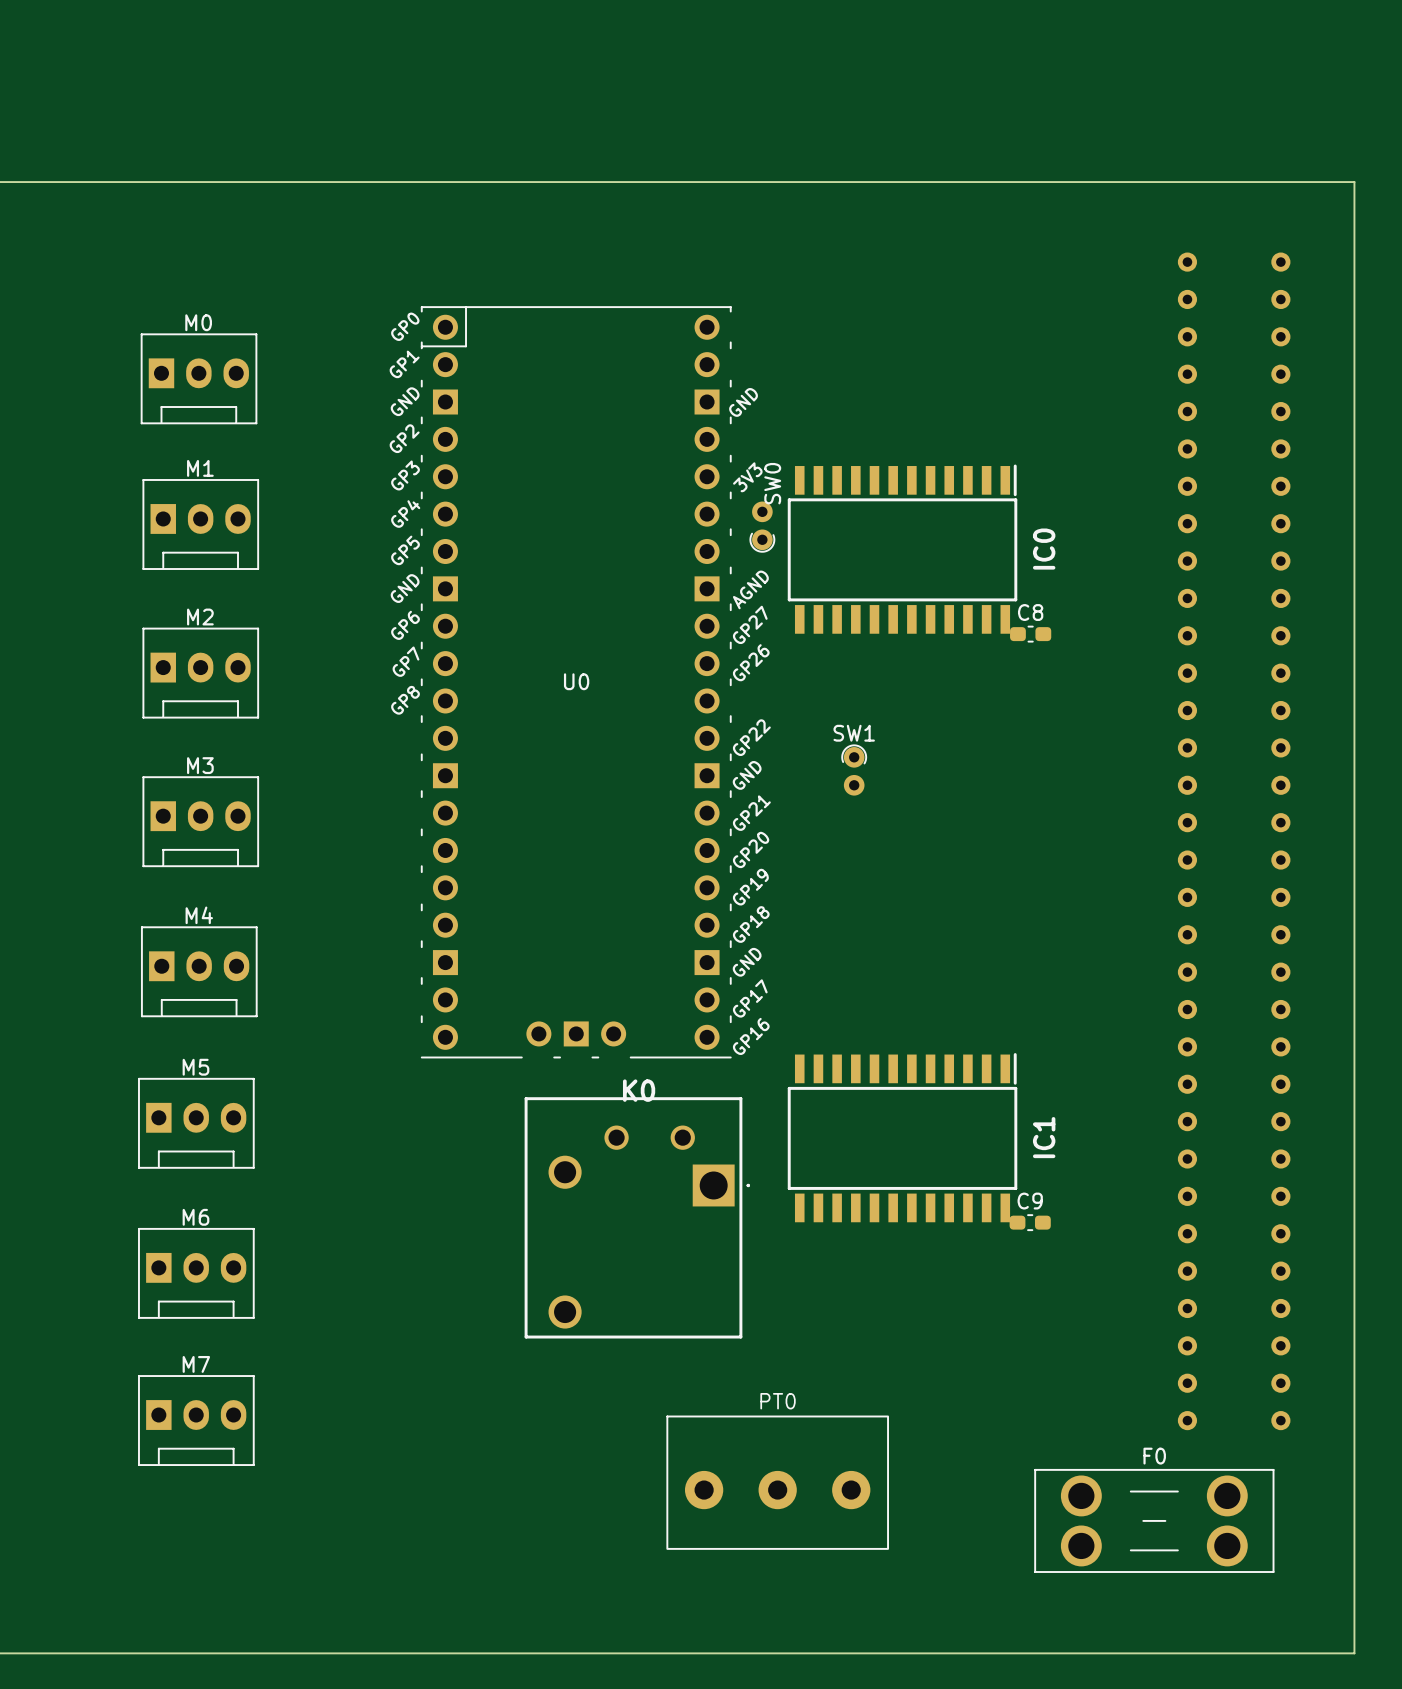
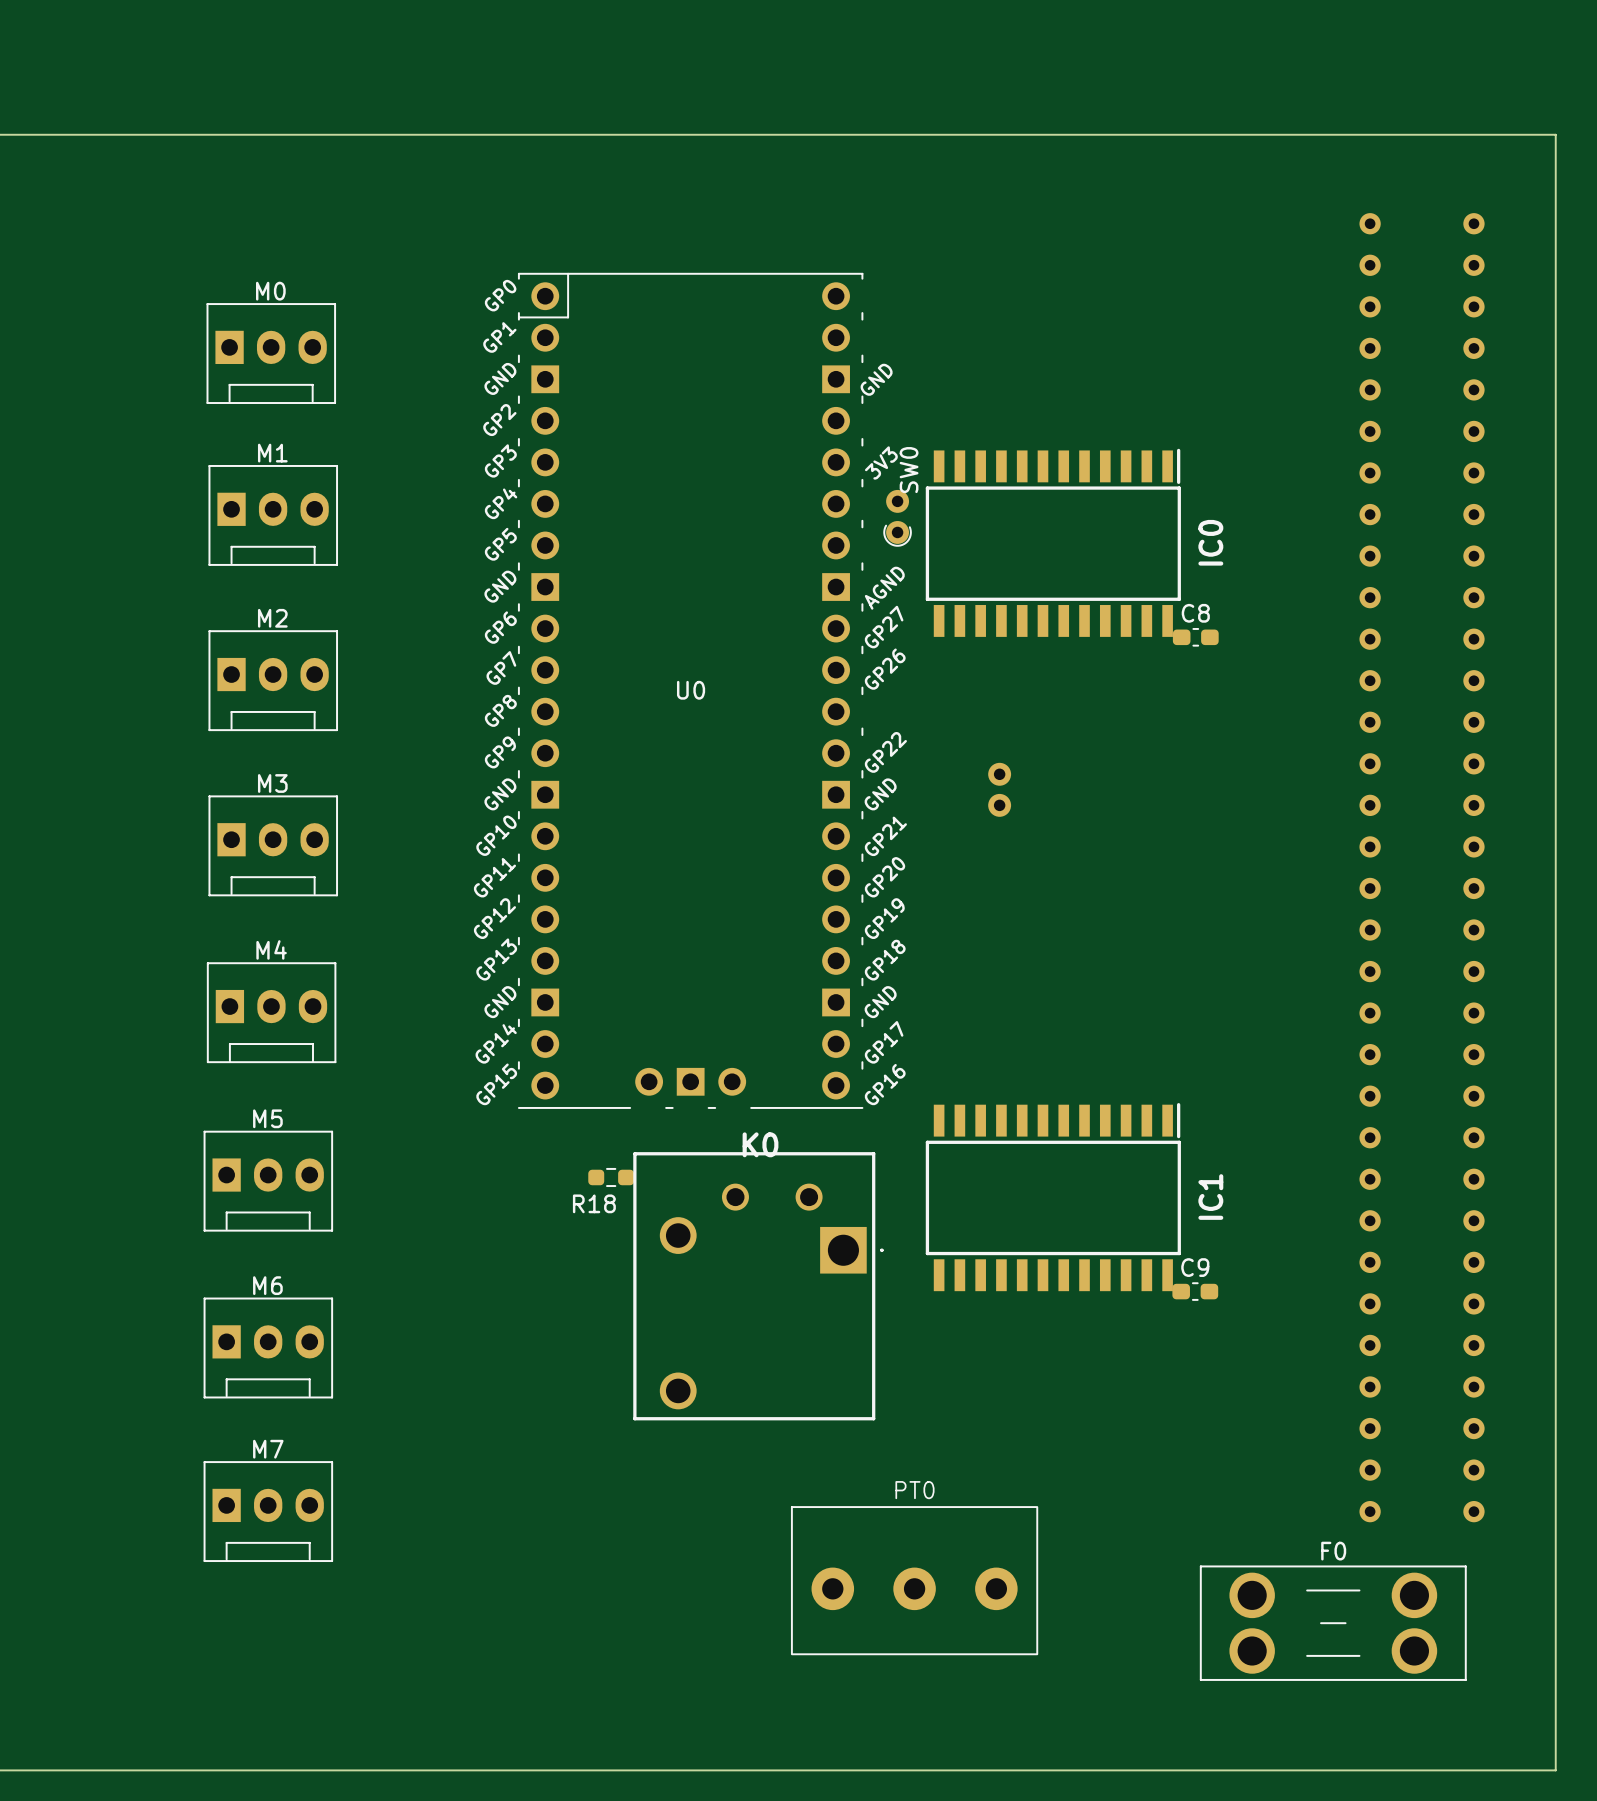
U0 footprint: [420, 306, 732, 1059] -> [517, 272, 864, 1109]
SW1 side: top (854, 770) -> bottom (999, 789)
R18: none -> (611, 1177)

